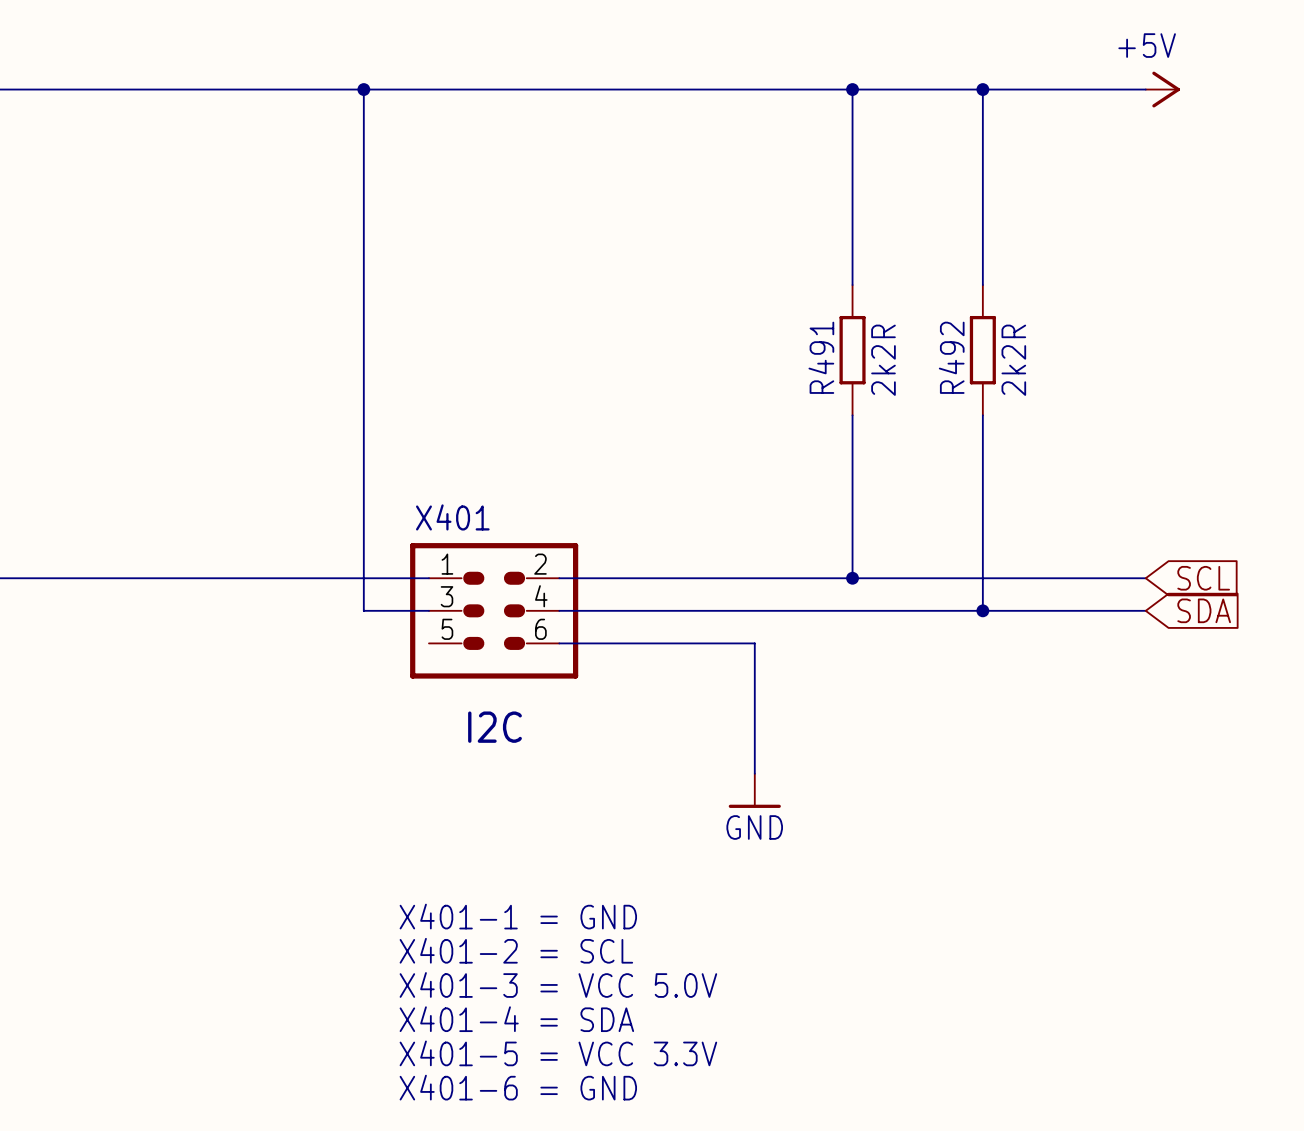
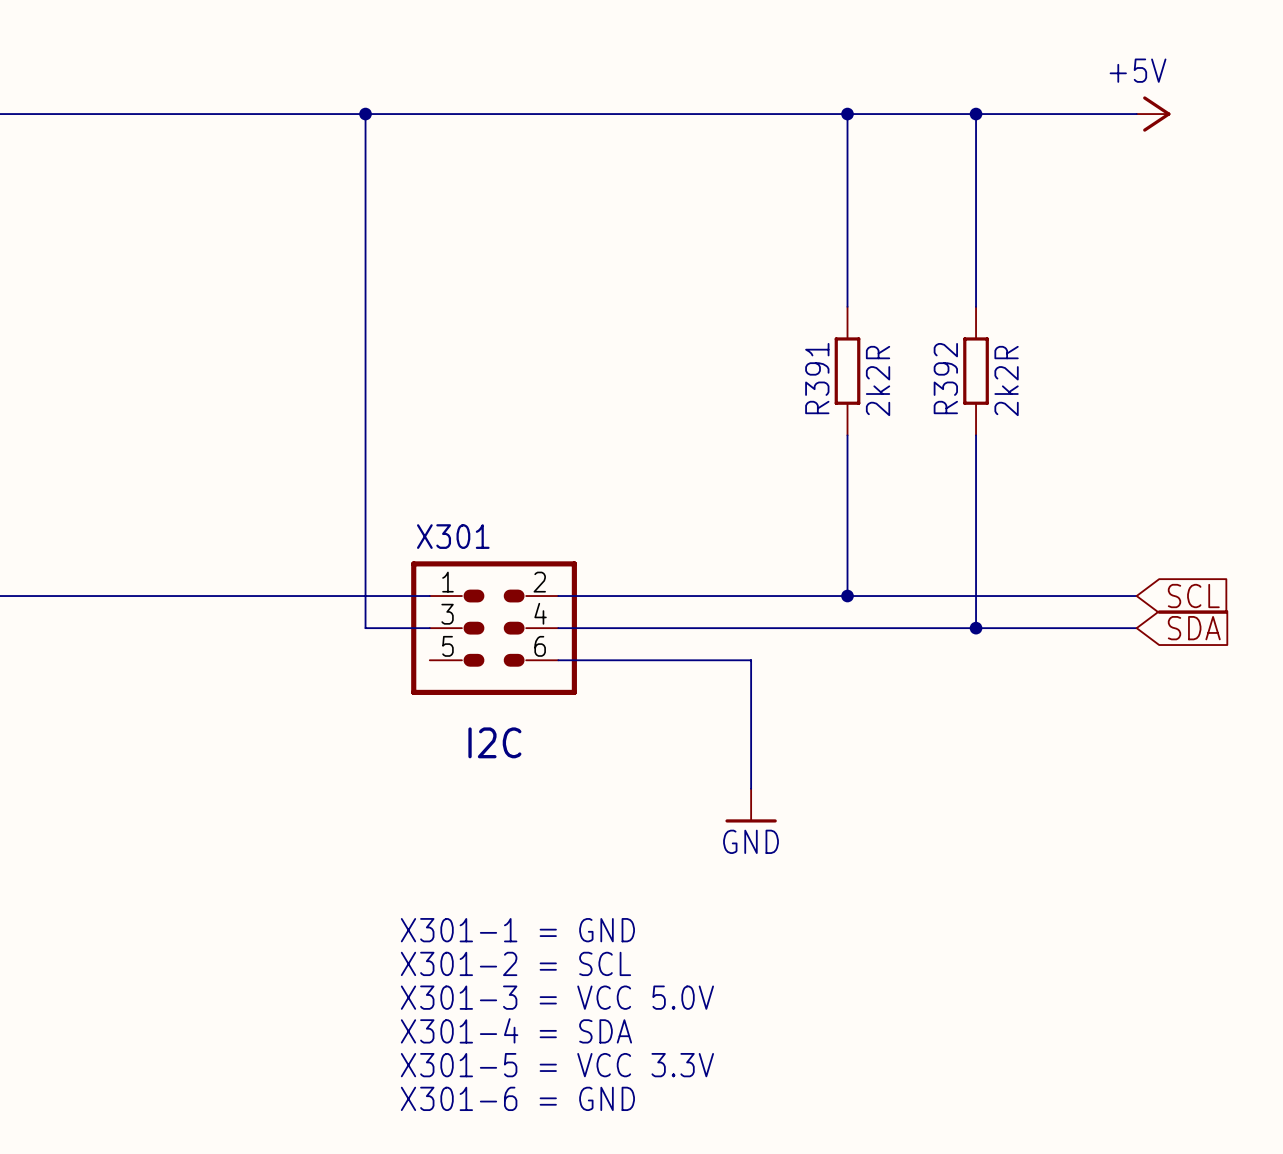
R491 name: R491 (821, 357) -> R391 (817, 378)
R492 name: R492 (951, 357) -> R392 (945, 378)
X401 name: X401 (452, 517) -> X301 (453, 536)
text: X401-1 = GND (518, 916) -> X301-1 = GND (517, 930)
text: X401-2 = SCL (516, 950) -> X301-2 = SCL (515, 963)
text: X401-3 = VCC 5.0V (558, 984) -> X301-3 = VCC 5.0V (557, 997)
text: X401-4 = SDA (516, 1019) -> X301-4 = SDA (516, 1030)
text: X401-5 = VCC 3.3V (558, 1053) -> X301-5 = VCC 3.3V (557, 1065)
text: X401-6 = GND (518, 1087) -> X301-6 = GND (517, 1098)

